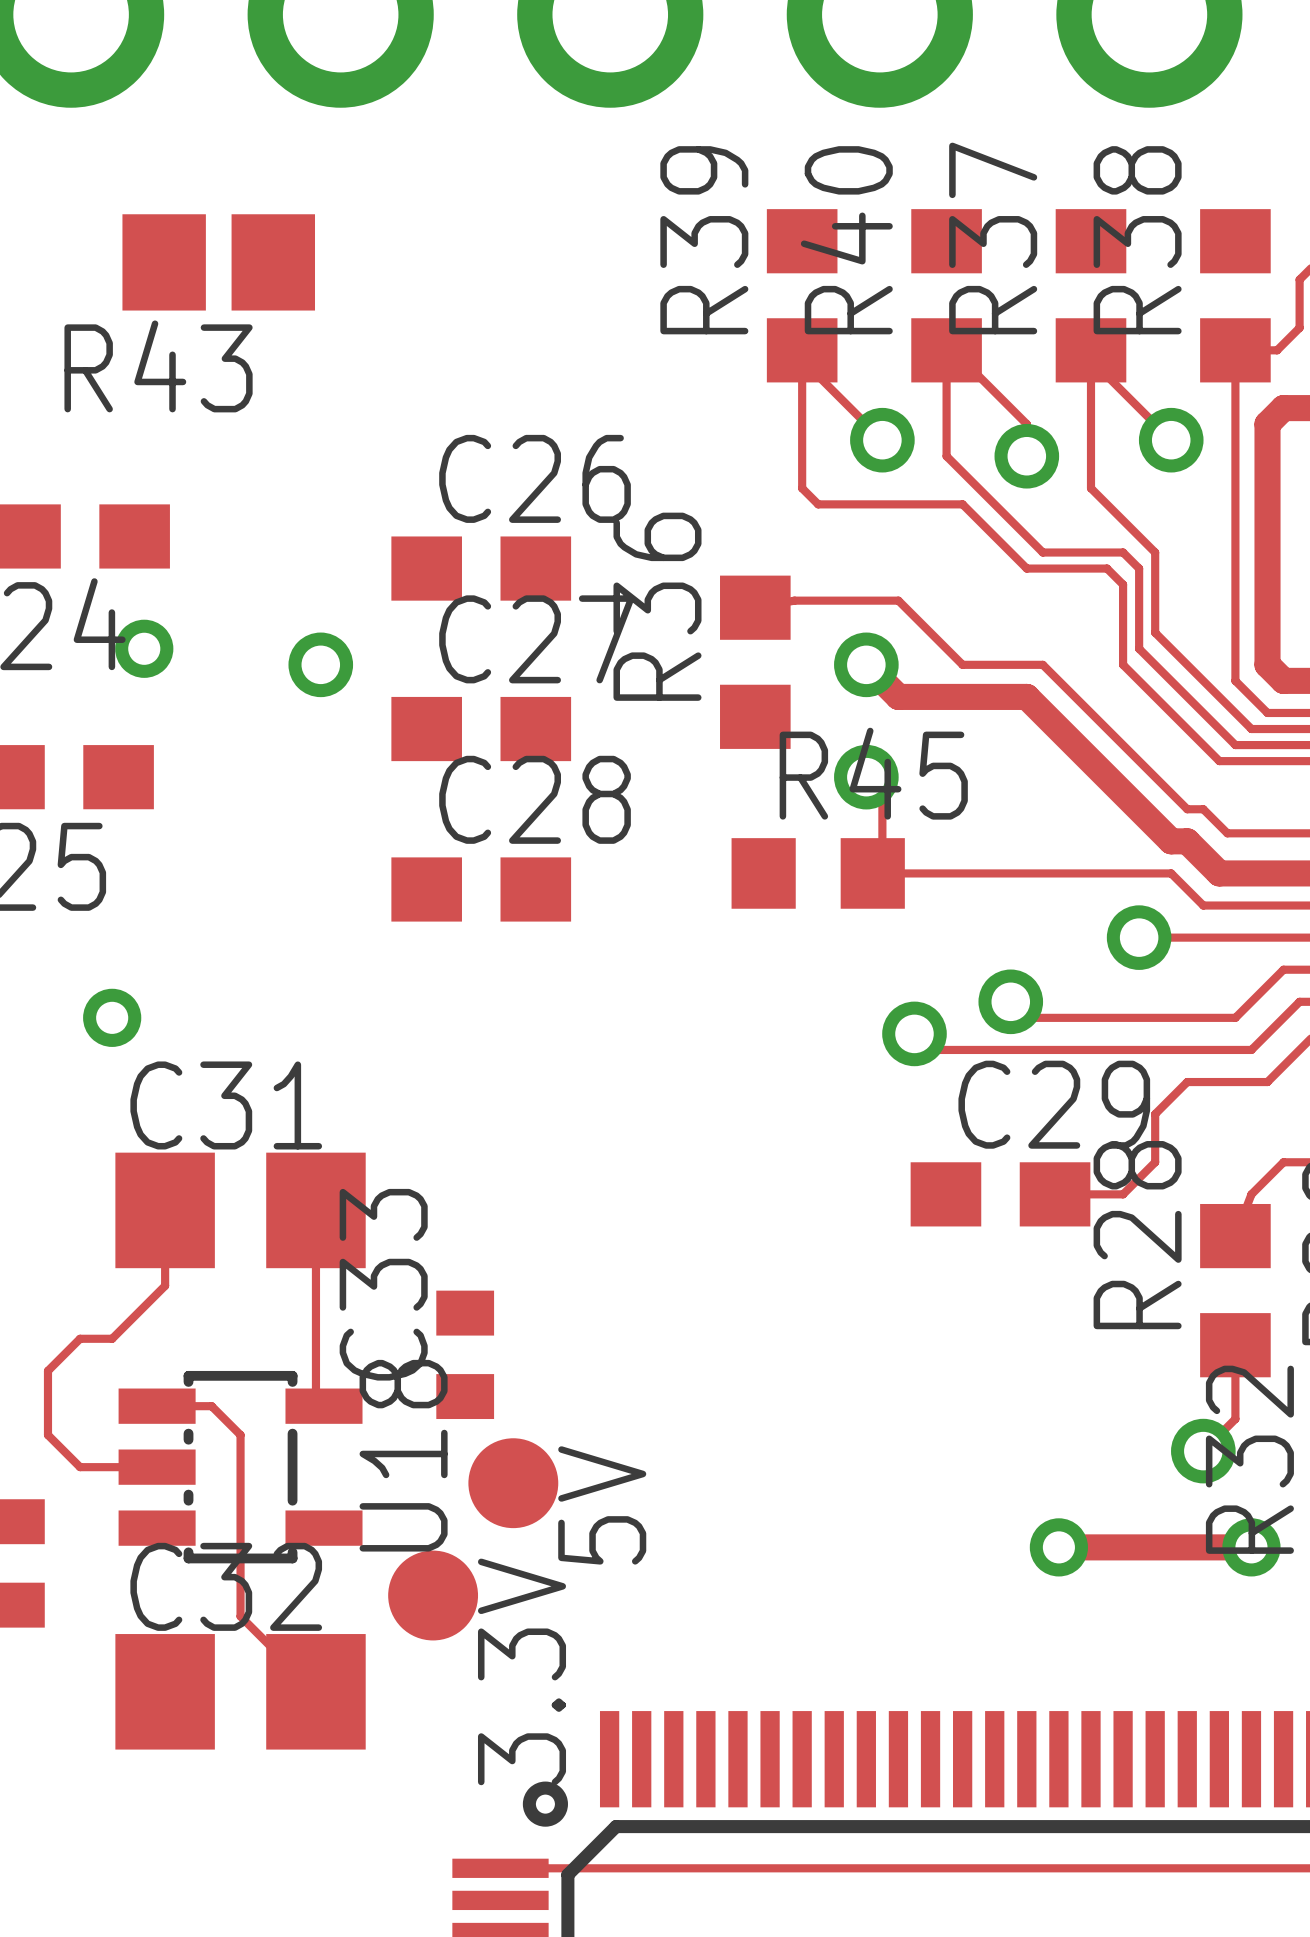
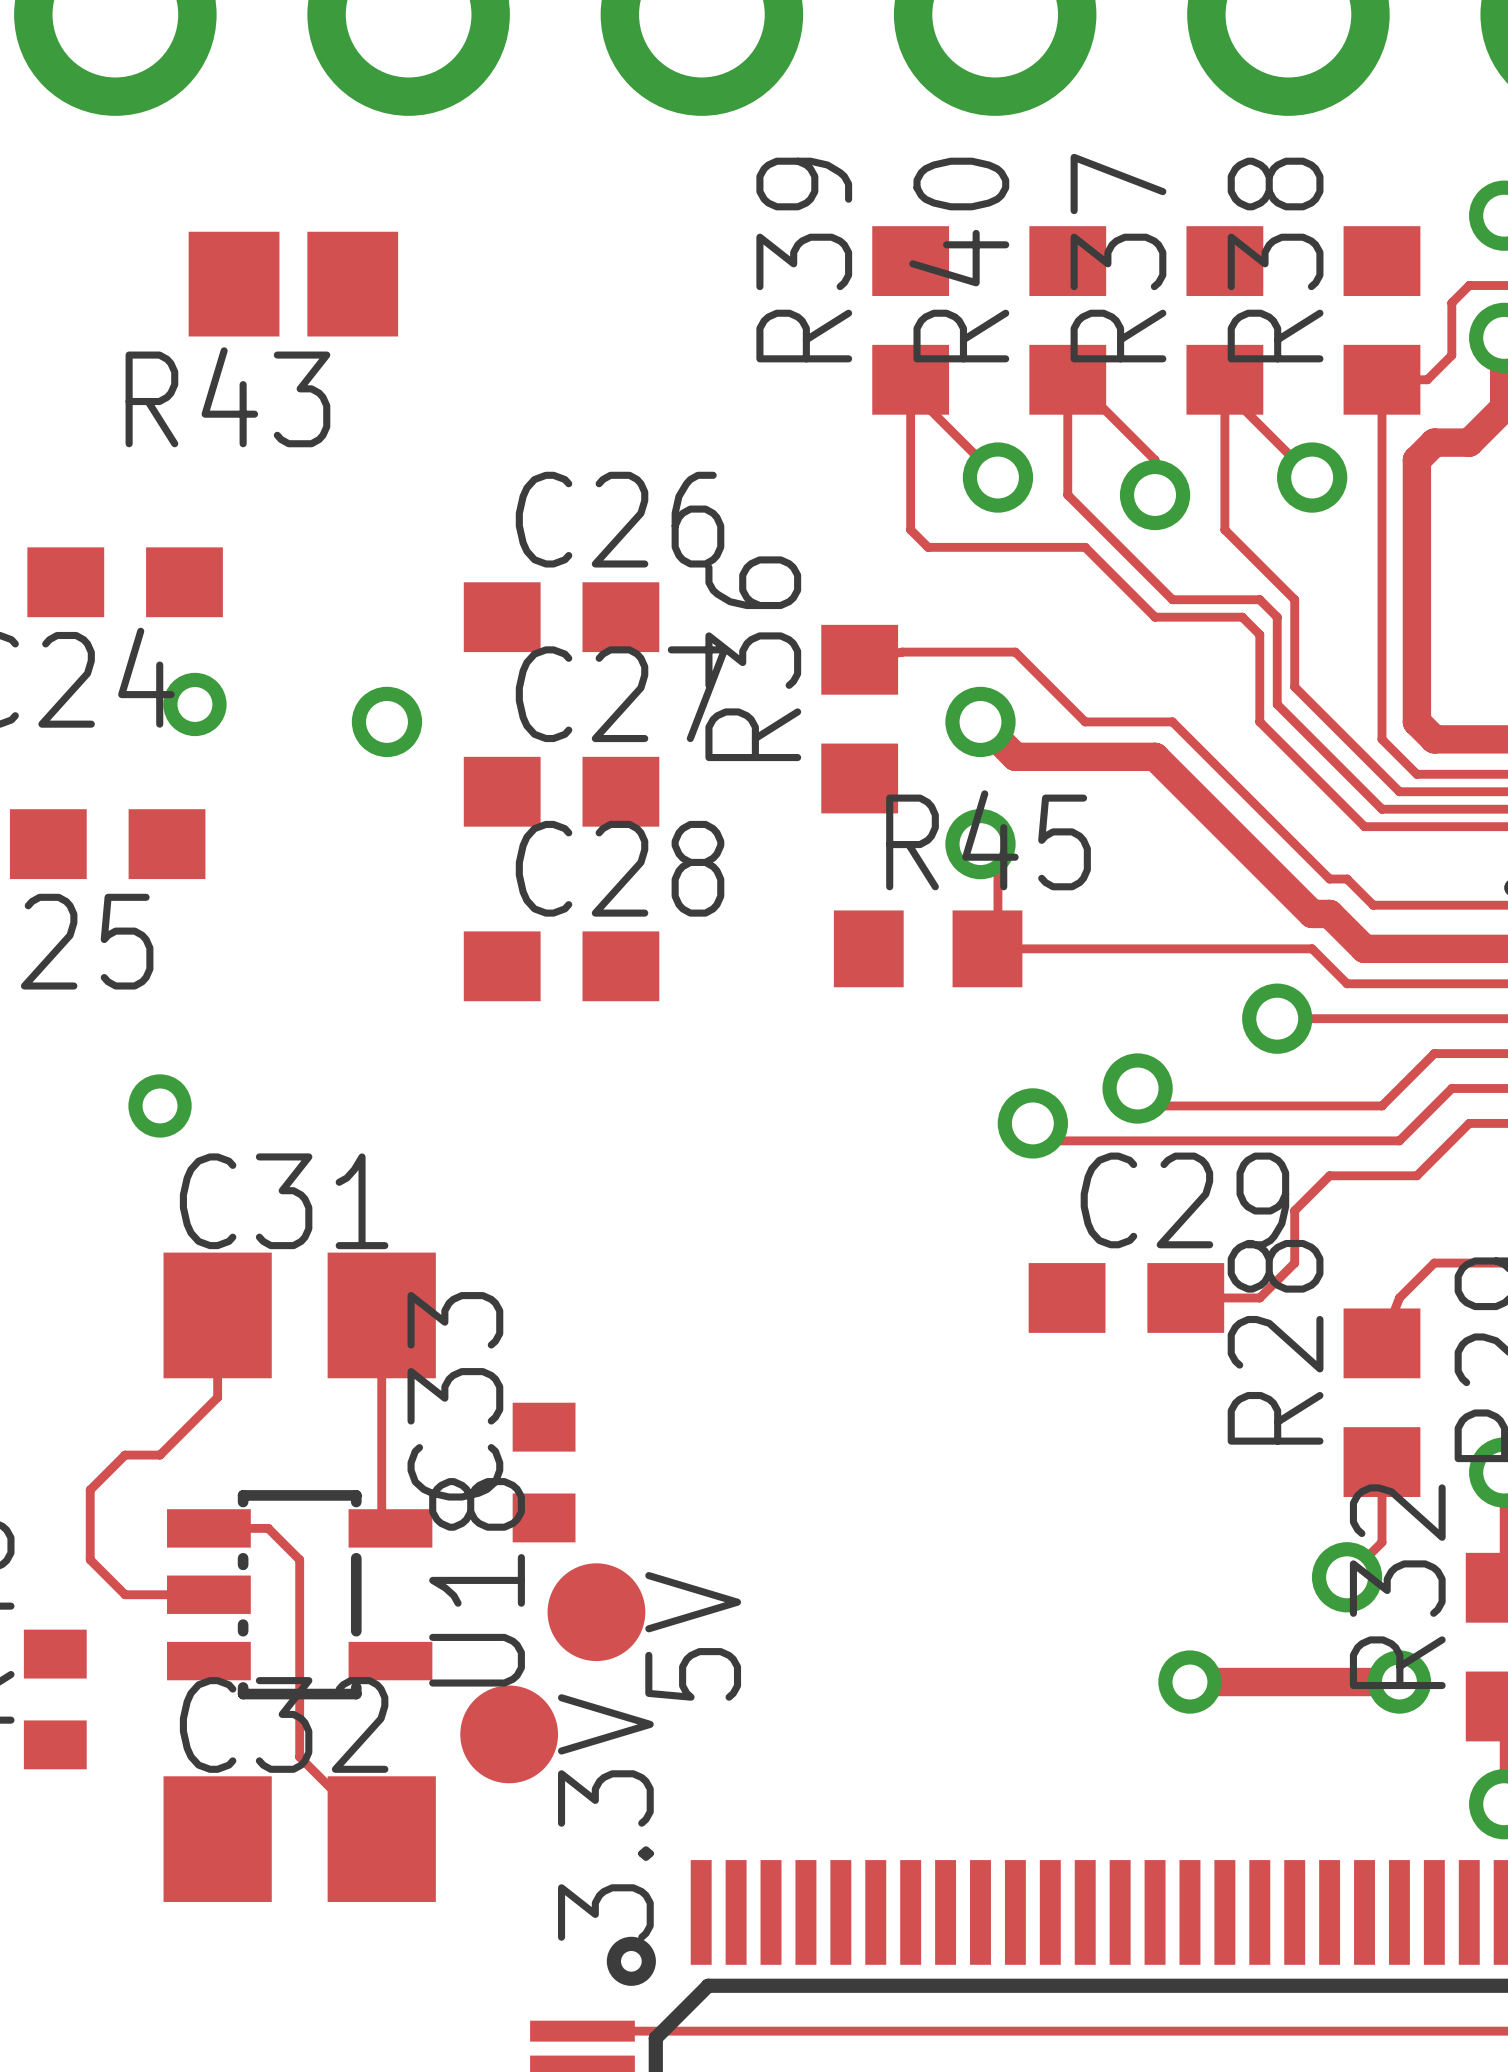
R43 position: (218, 262) -> (293, 284)

